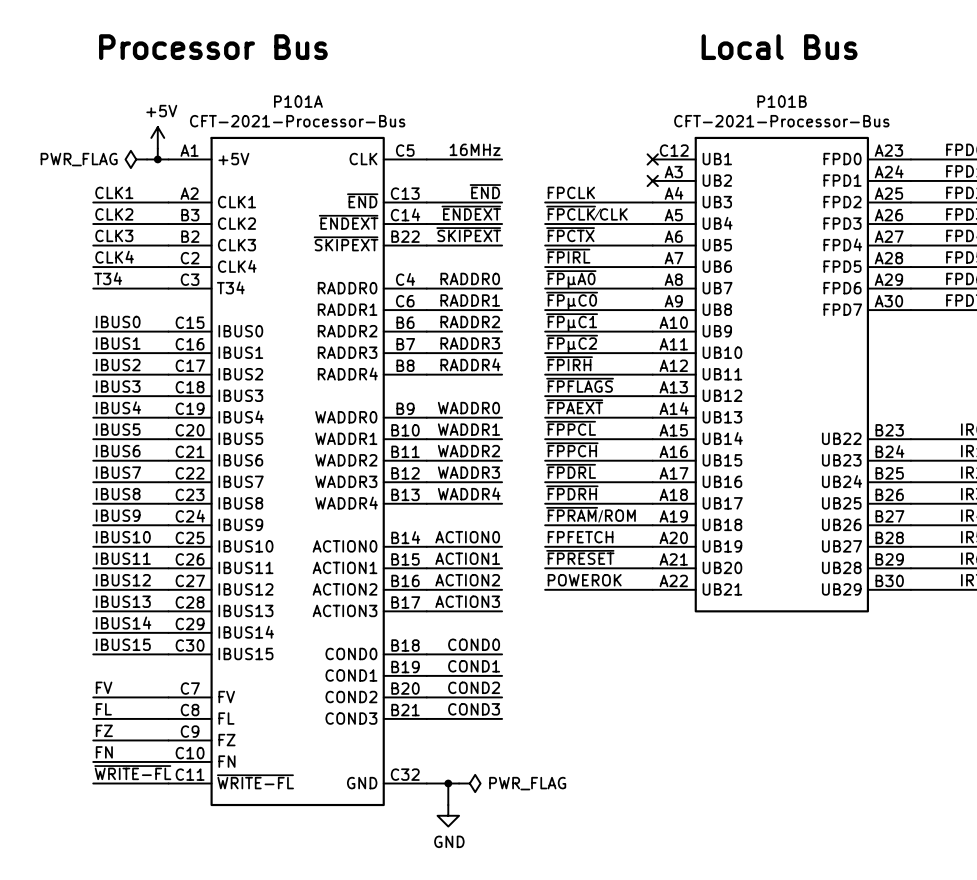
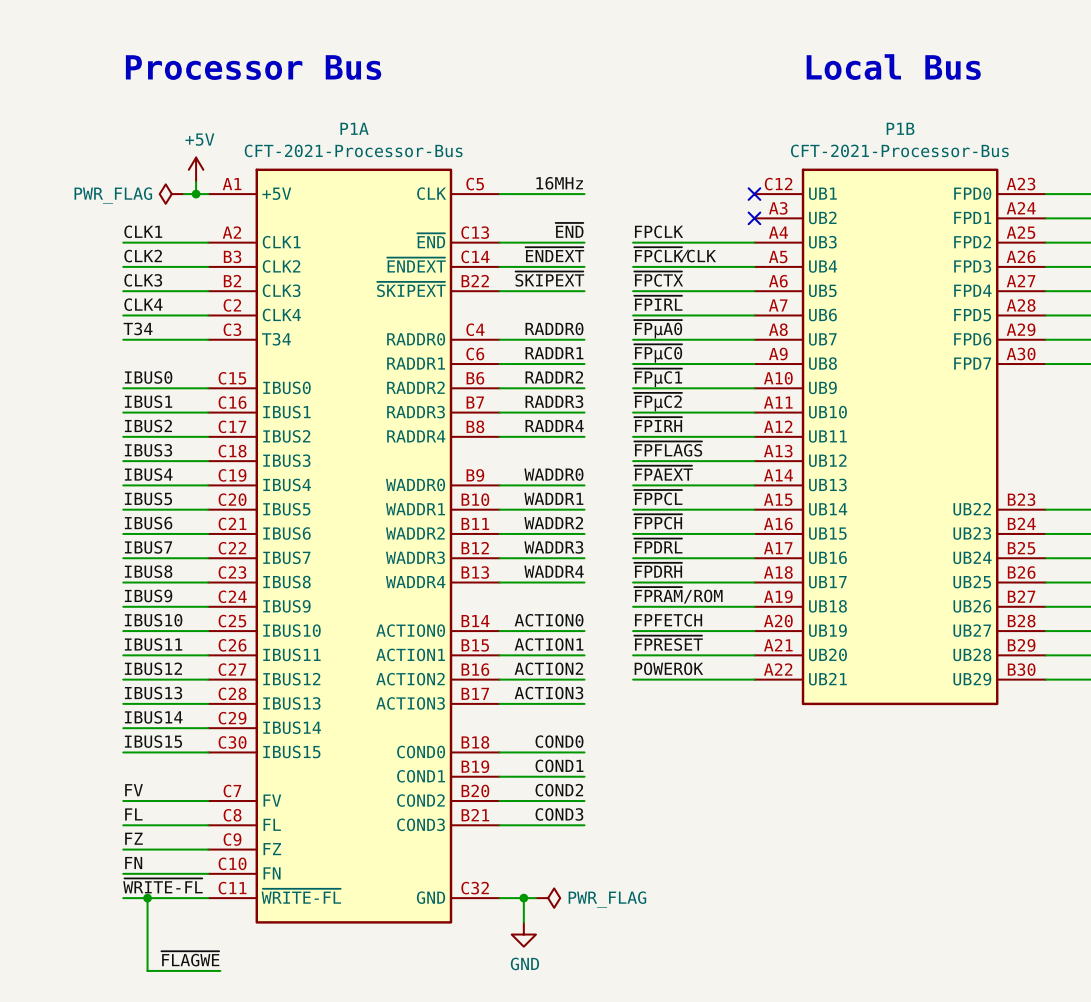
P101A name: P101A (298, 101) -> P1A (354, 128)
P101B name: P101B (782, 101) -> P1B (900, 128)
wire: none -> (147, 898) (147, 970) (220, 970)
junction: none -> (147, 898)
label: none -> ~{FLAGWE} (190, 958)

